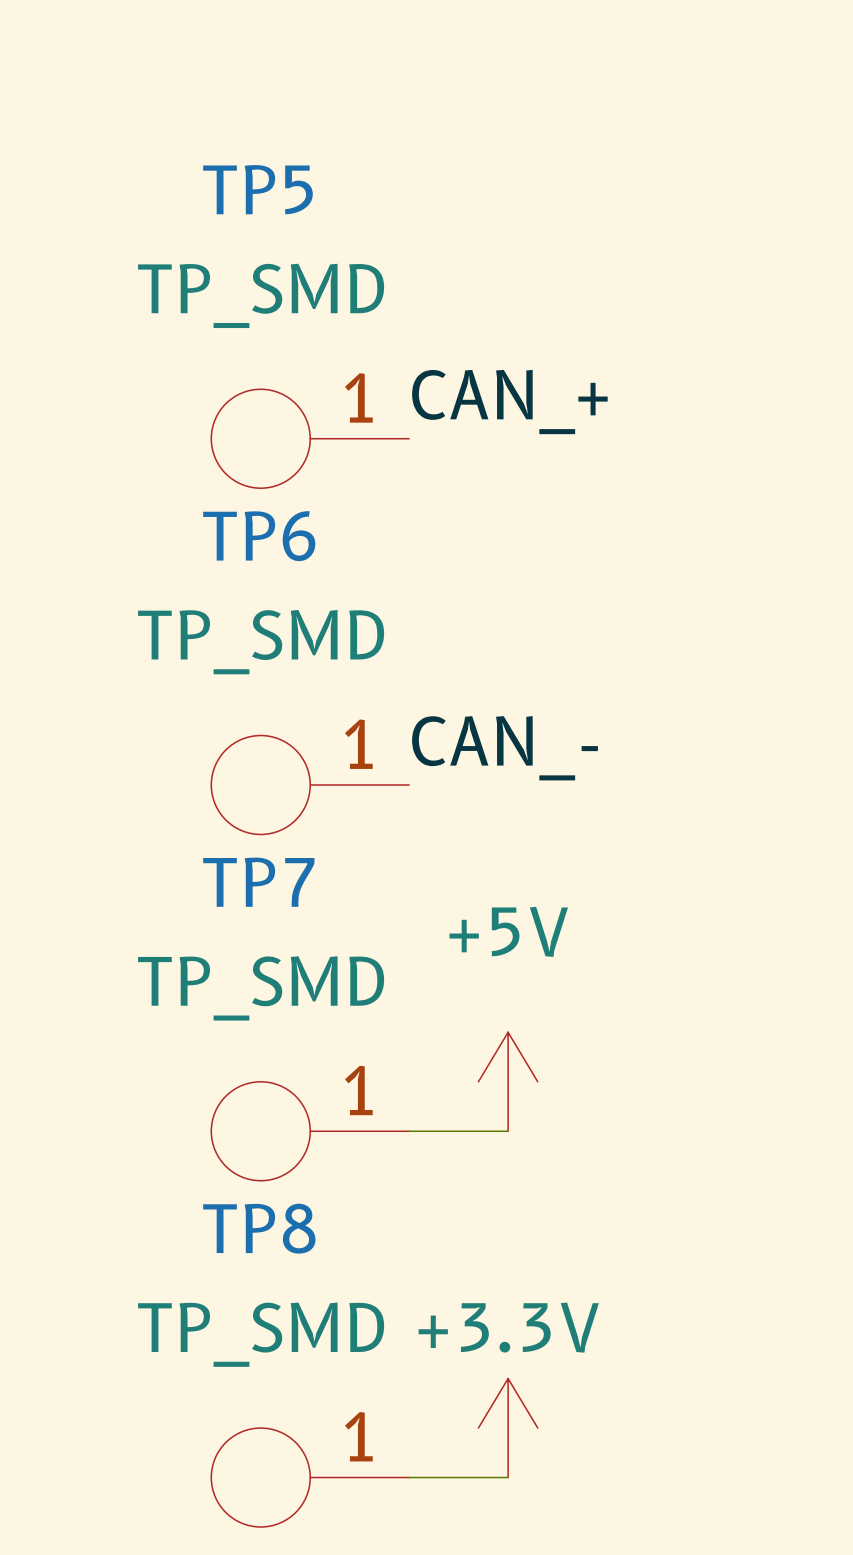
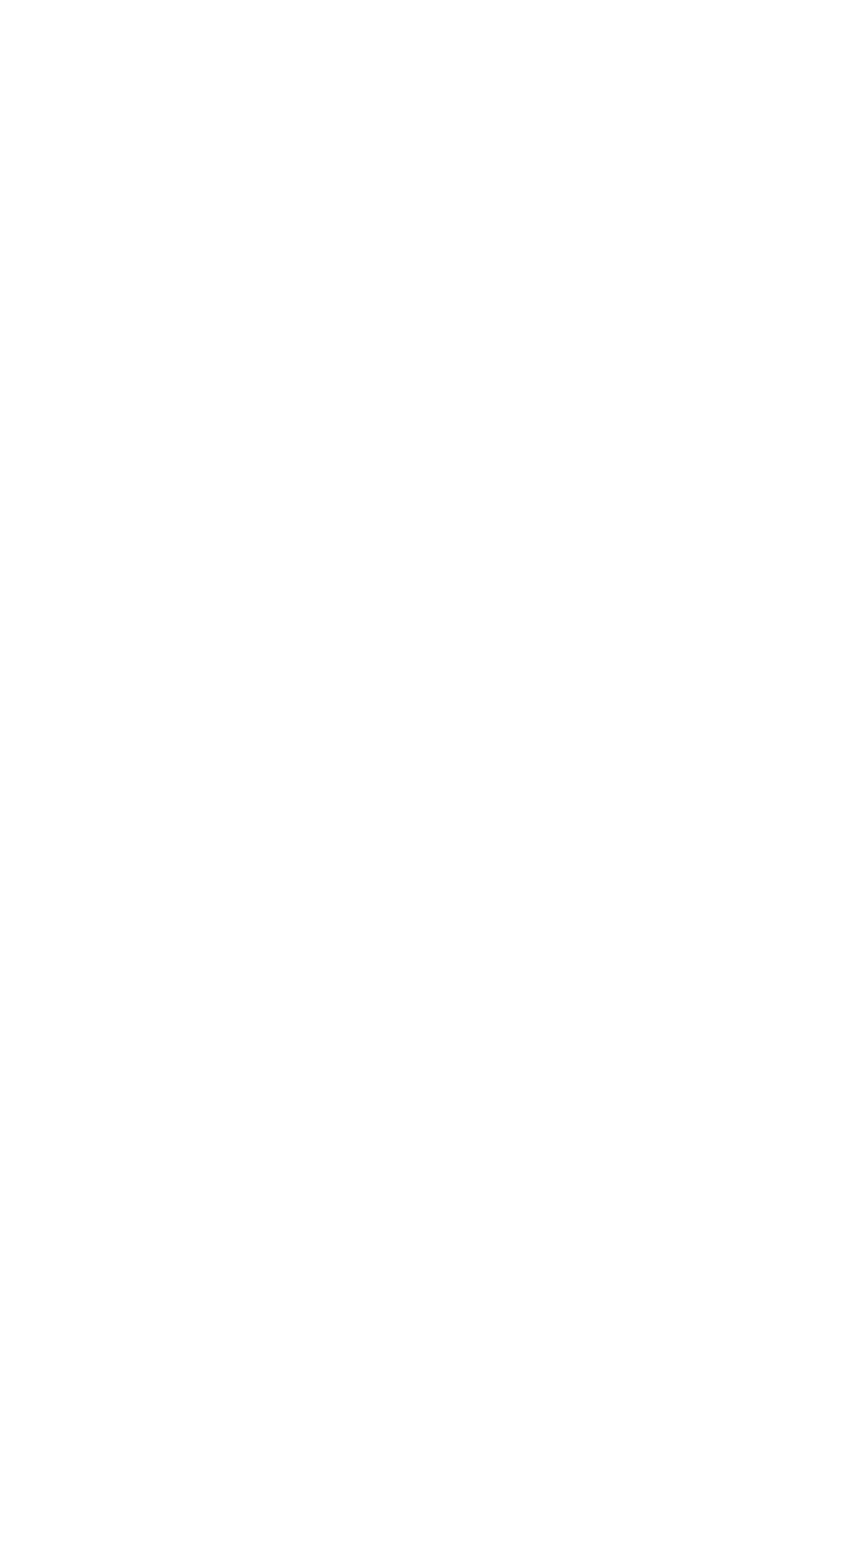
label: CAN_+ (509, 402) -> none
TP5: TP_SMD (310, 438) -> none
label: CAN_- (504, 748) -> none
TP6: TP_SMD (310, 785) -> none
power symbol: +5V (508, 1081) -> none
TP7: TP_SMD (310, 1131) -> none
wire: (409, 1131) (508, 1131) -> none
power symbol: +3.3V (508, 1428) -> none
TP8: TP_SMD (310, 1477) -> none
wire: (409, 1477) (508, 1477) -> none

